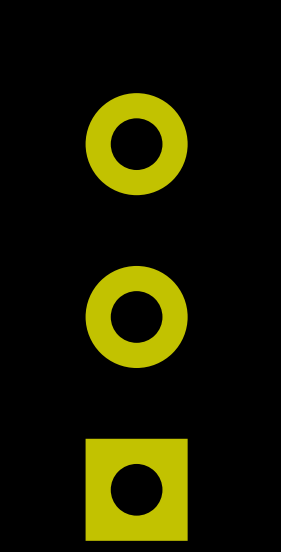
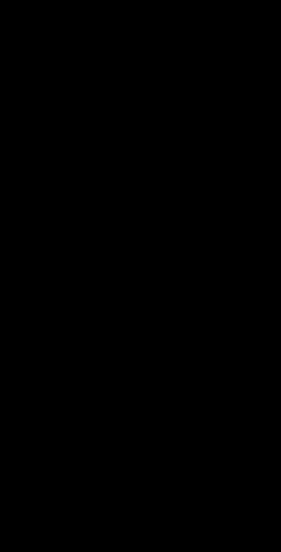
part: (136, 316) -> none

